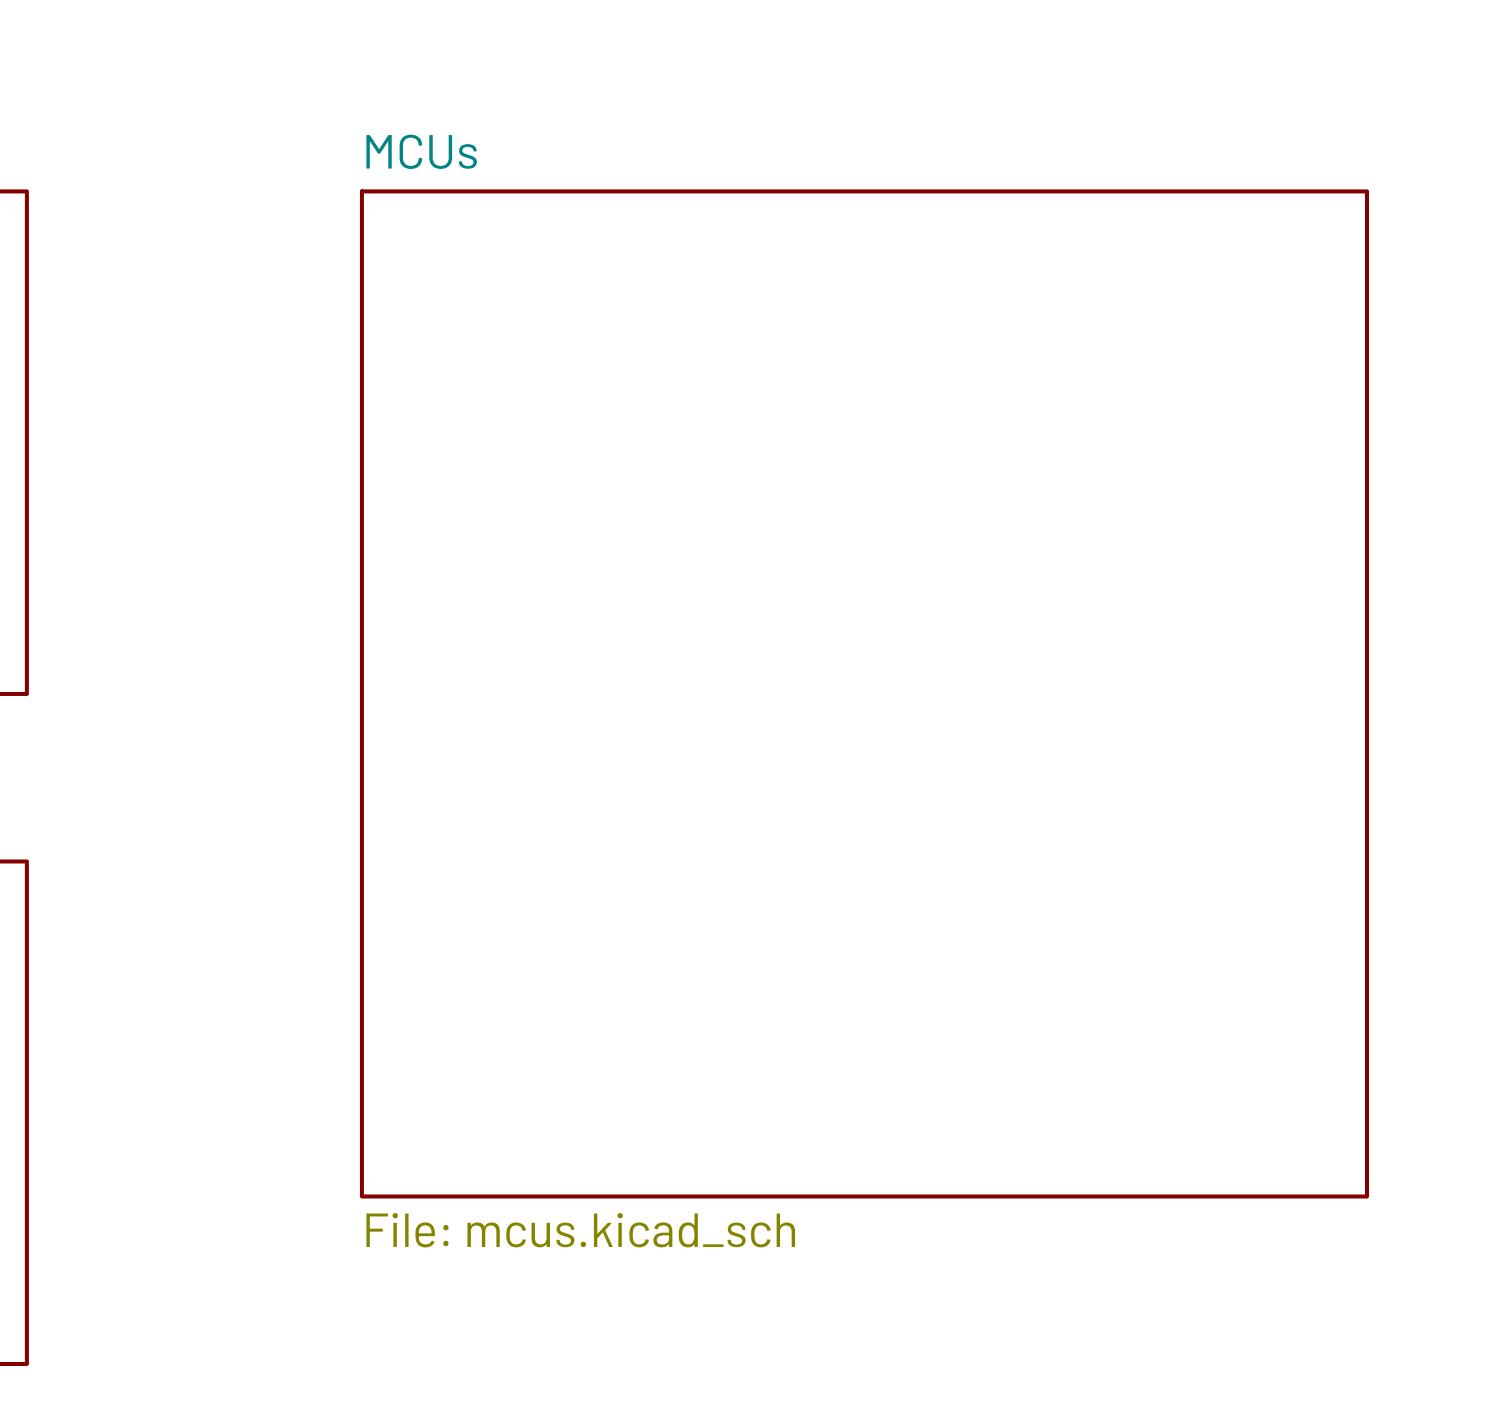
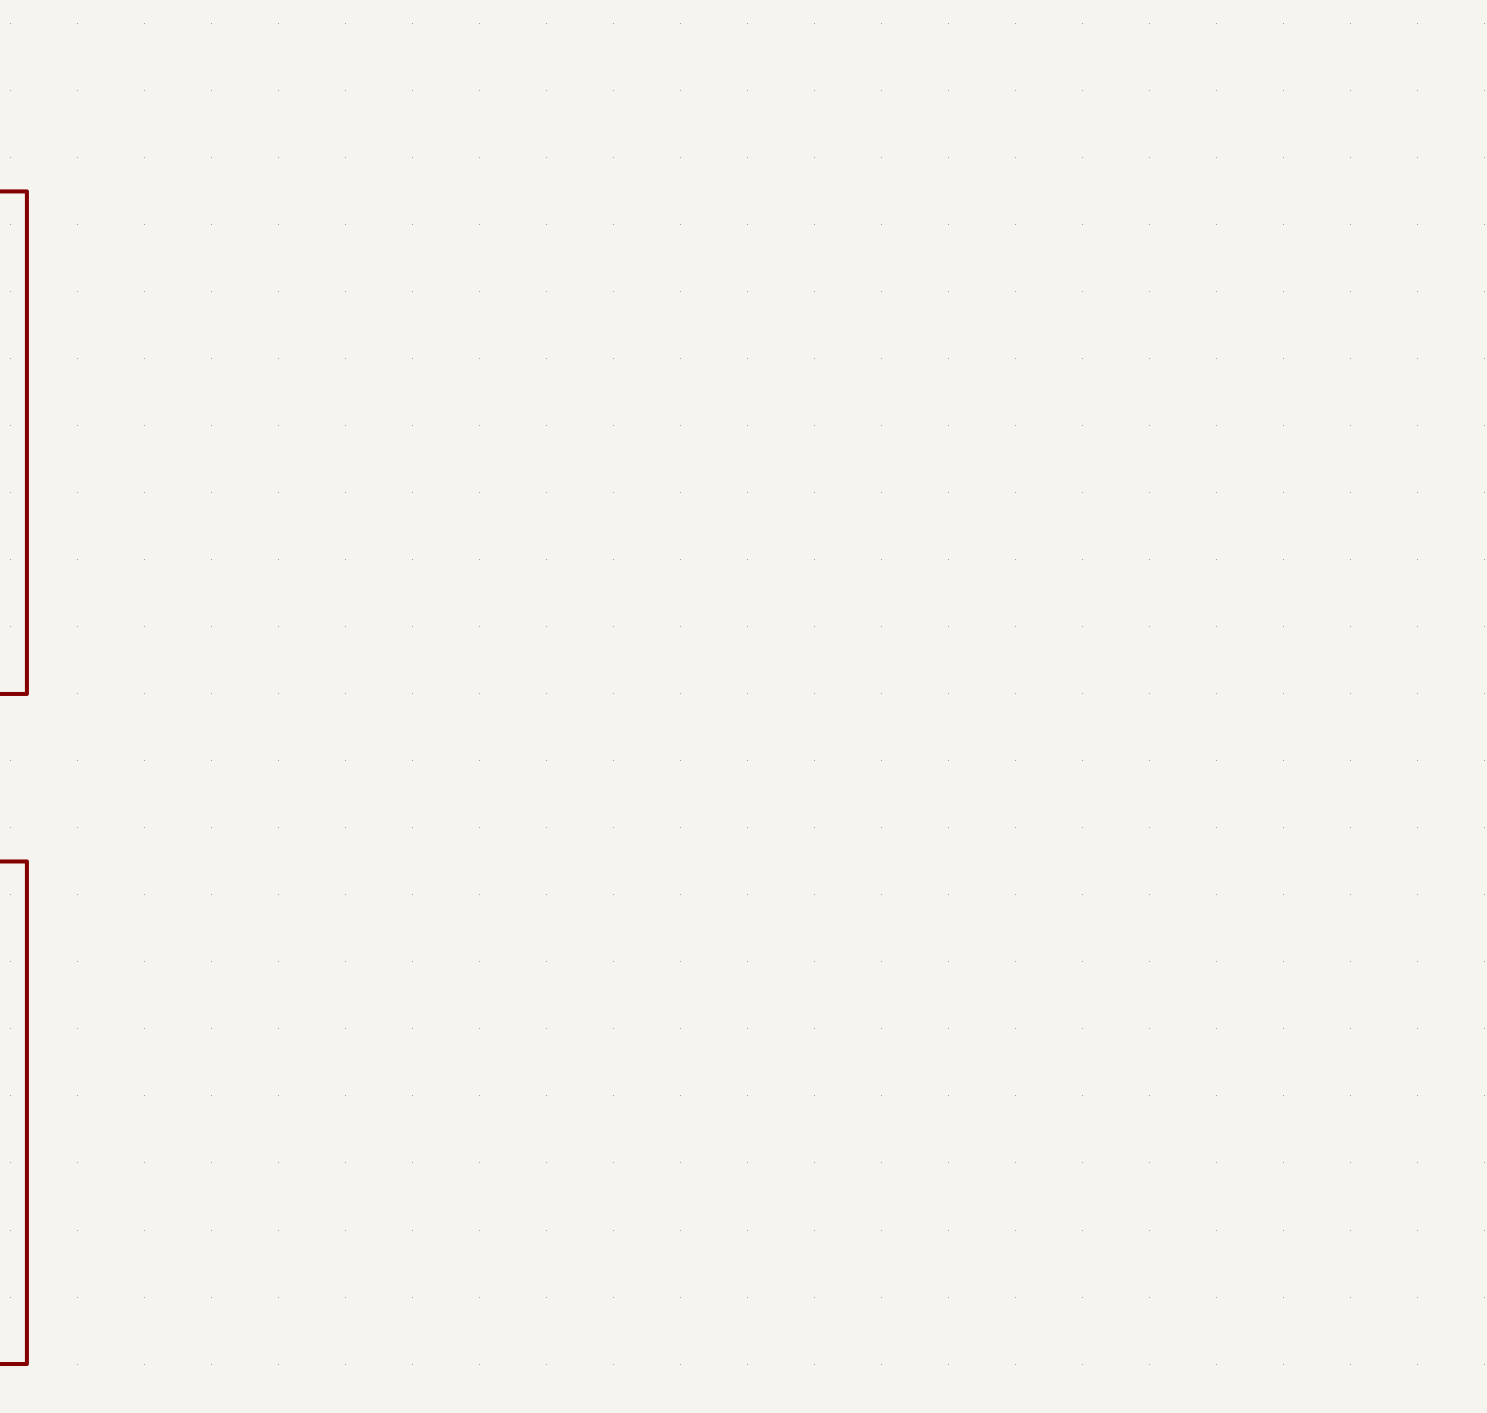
sheet MCUs: File: mcus.kicad_sch (864, 693) -> none

